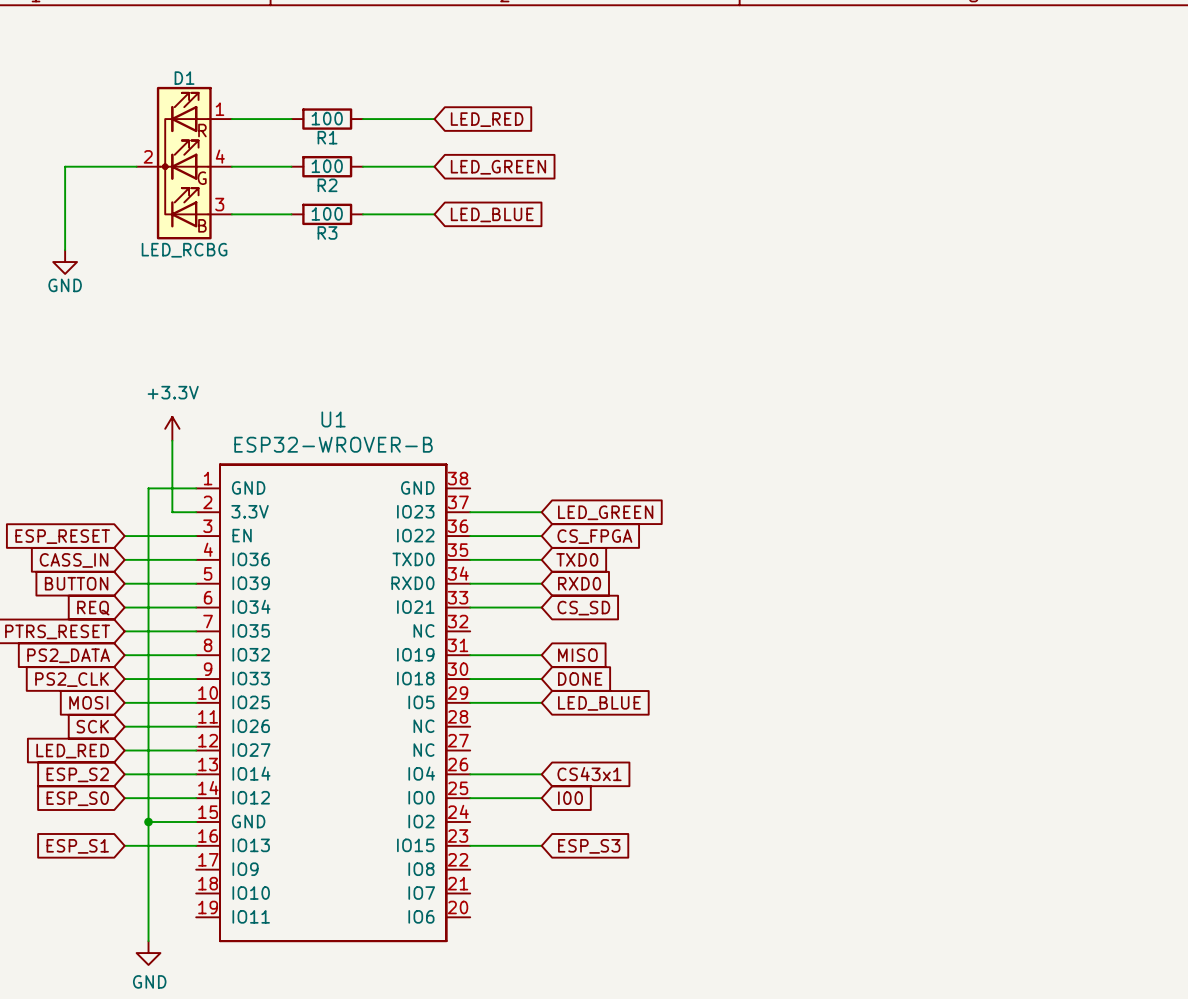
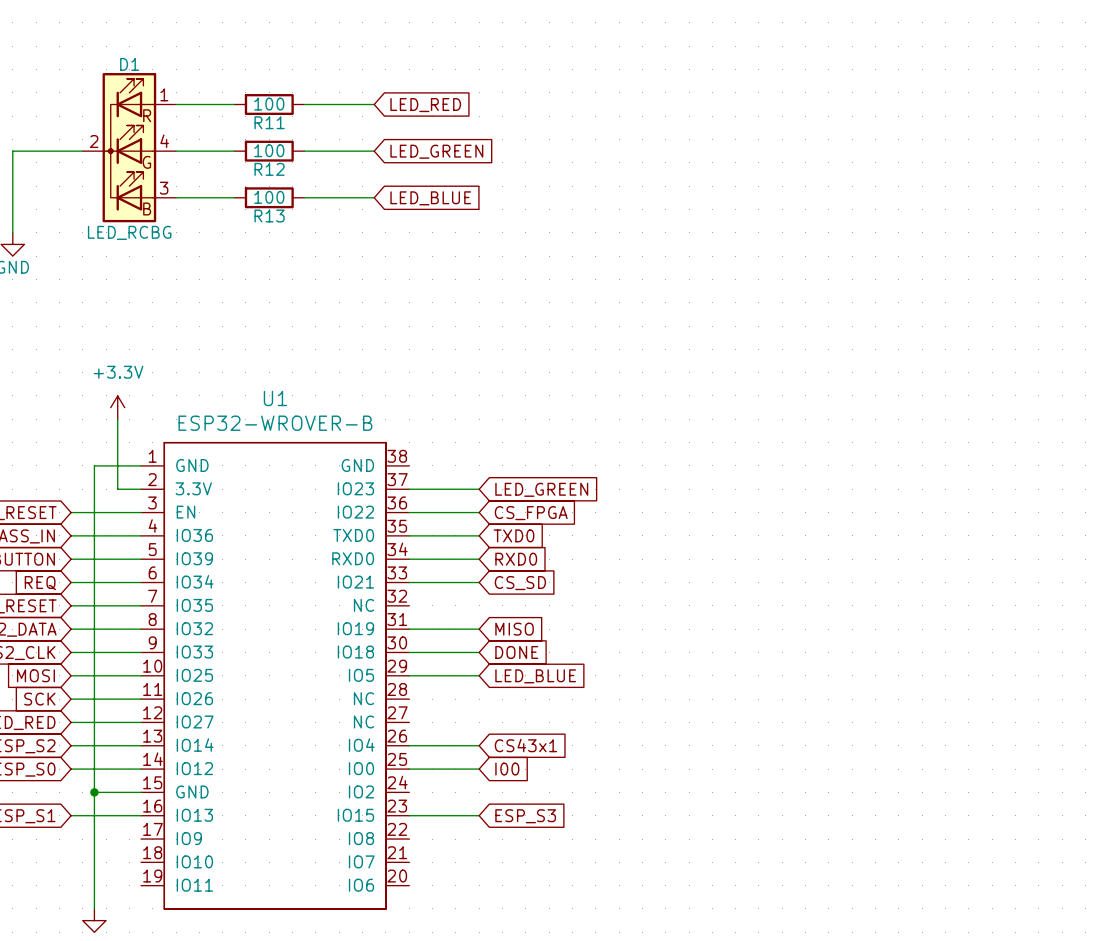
R1 name: R1 (327, 137) -> R11 (269, 122)
R2 name: R2 (327, 185) -> R12 (269, 169)
R3 name: R3 (327, 232) -> R13 (269, 216)

